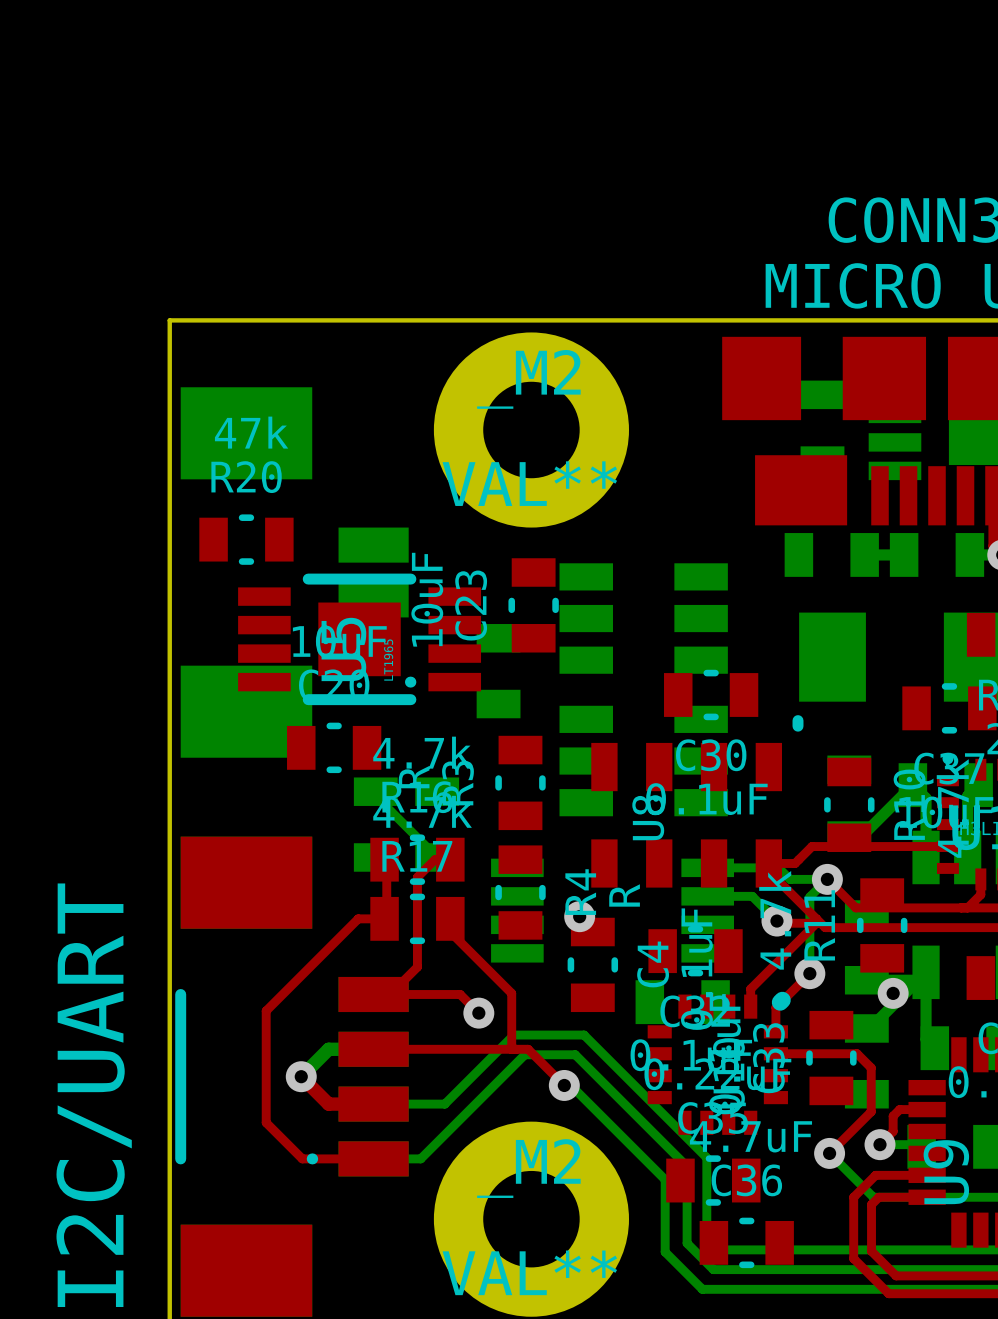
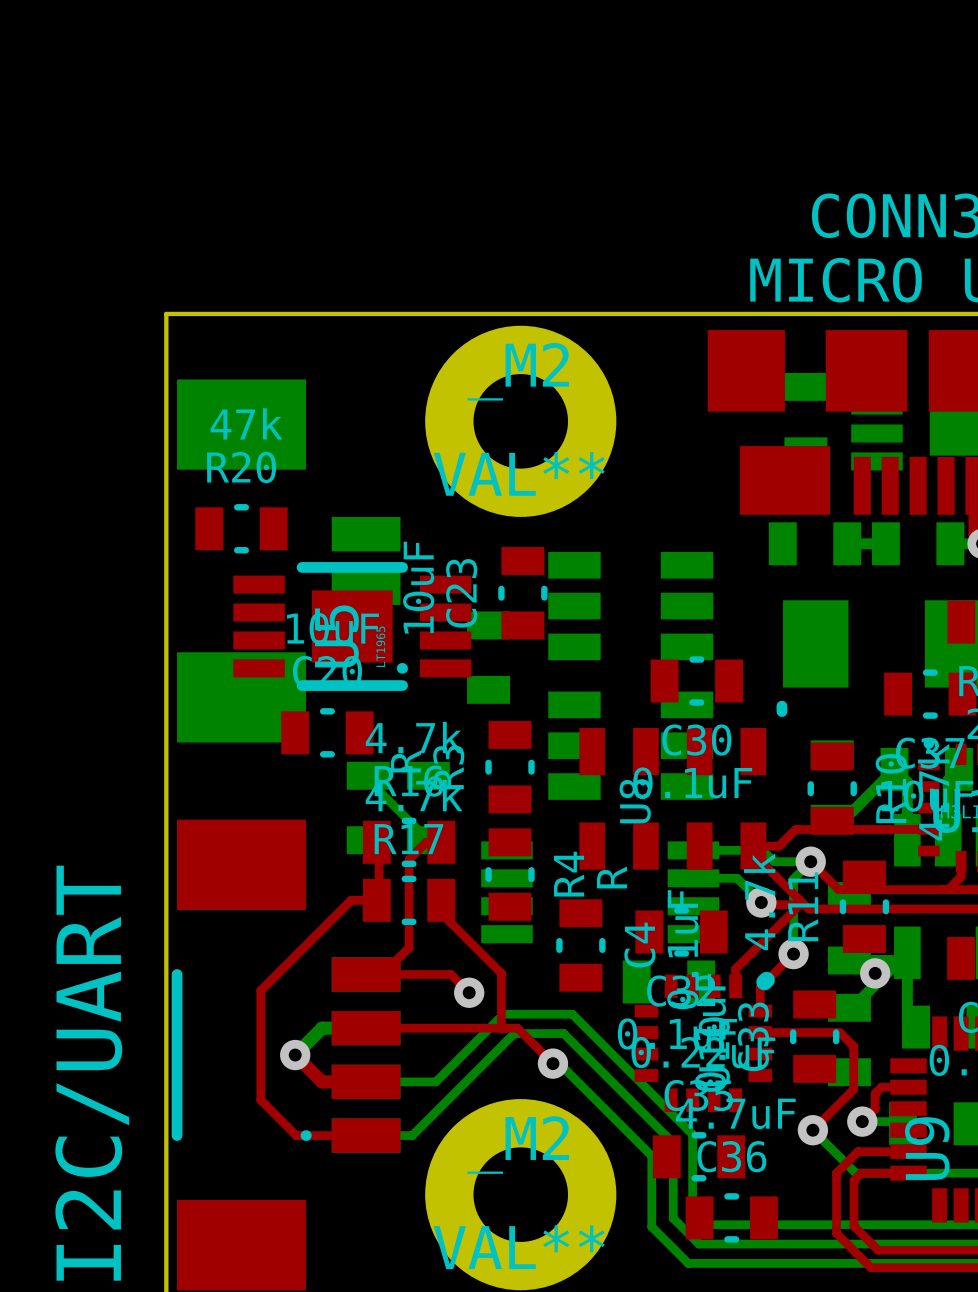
via: (579, 916) -> none

